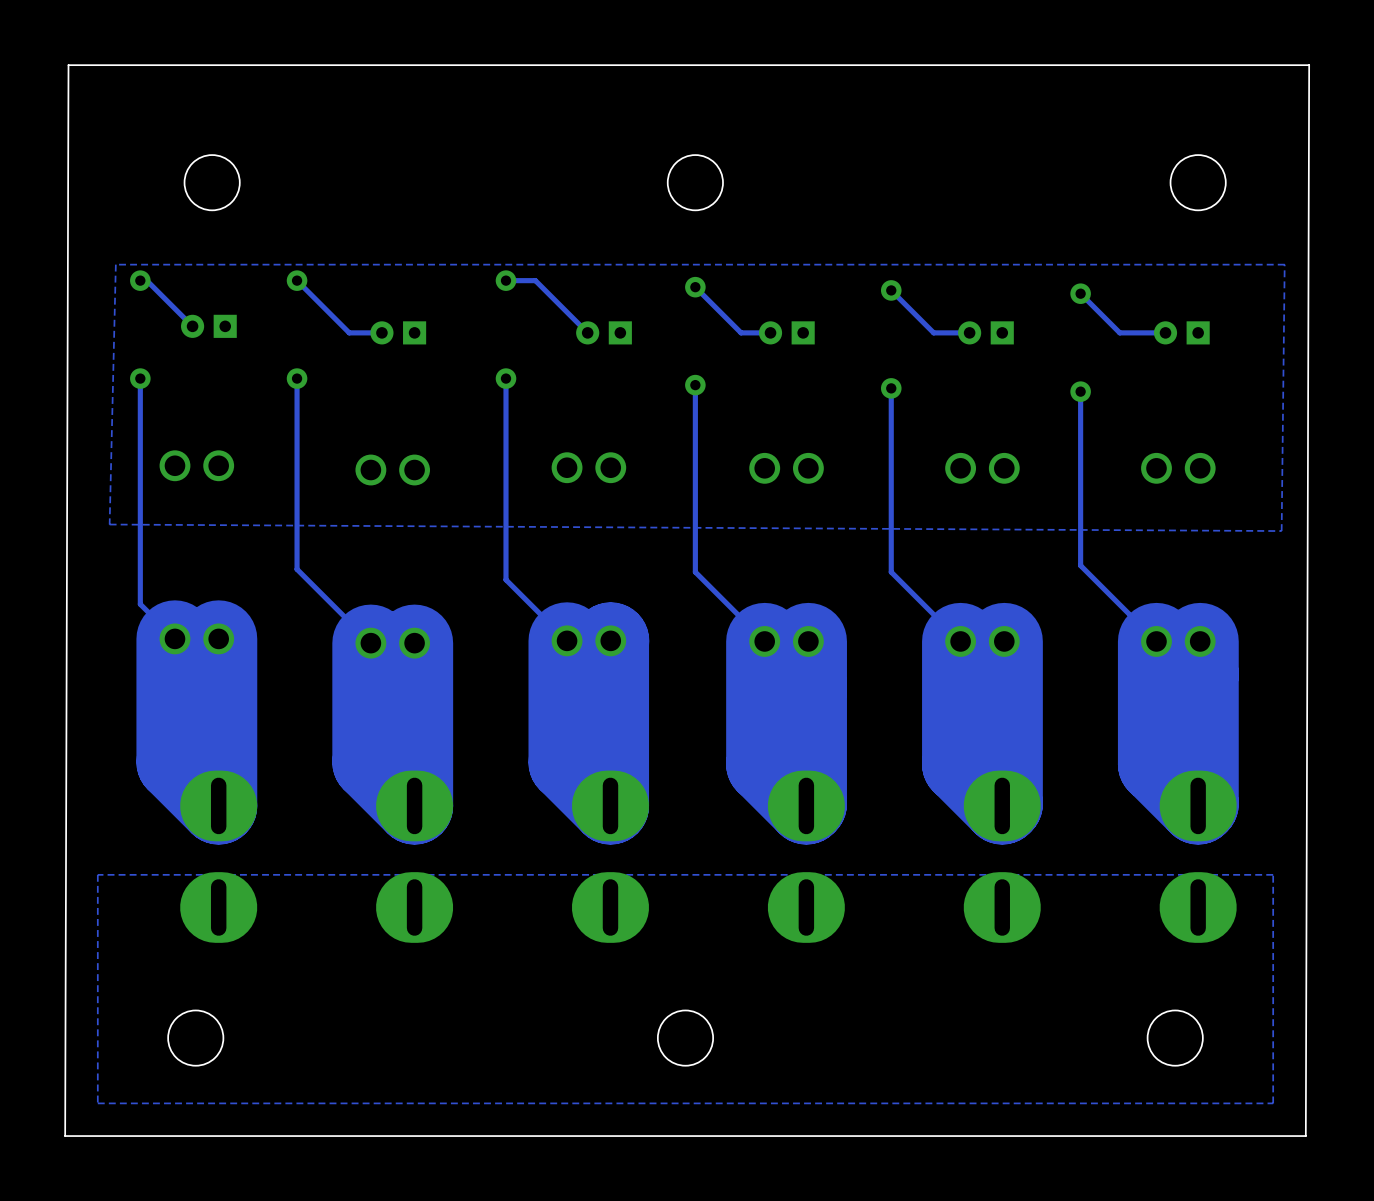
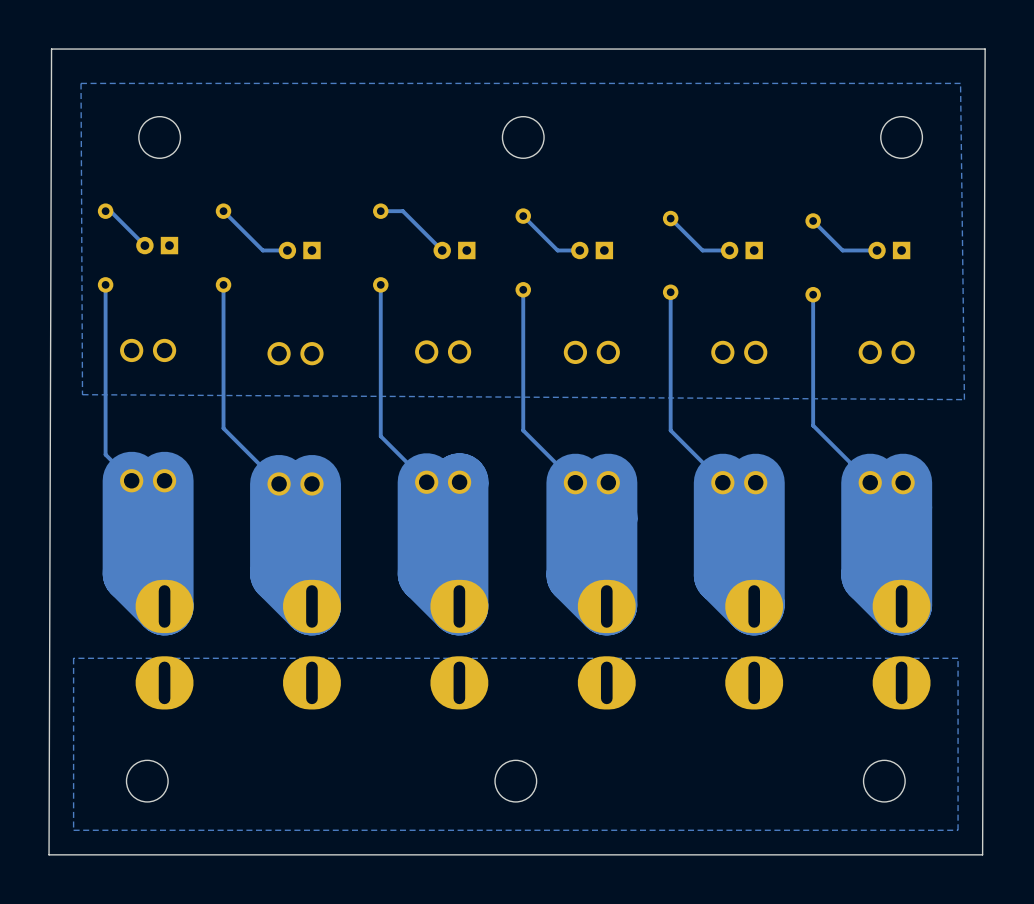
zone outline: (109, 524) (115, 264) (1284, 264) (1281, 531) -> (82, 394) (81, 83) (960, 83) (964, 399)

